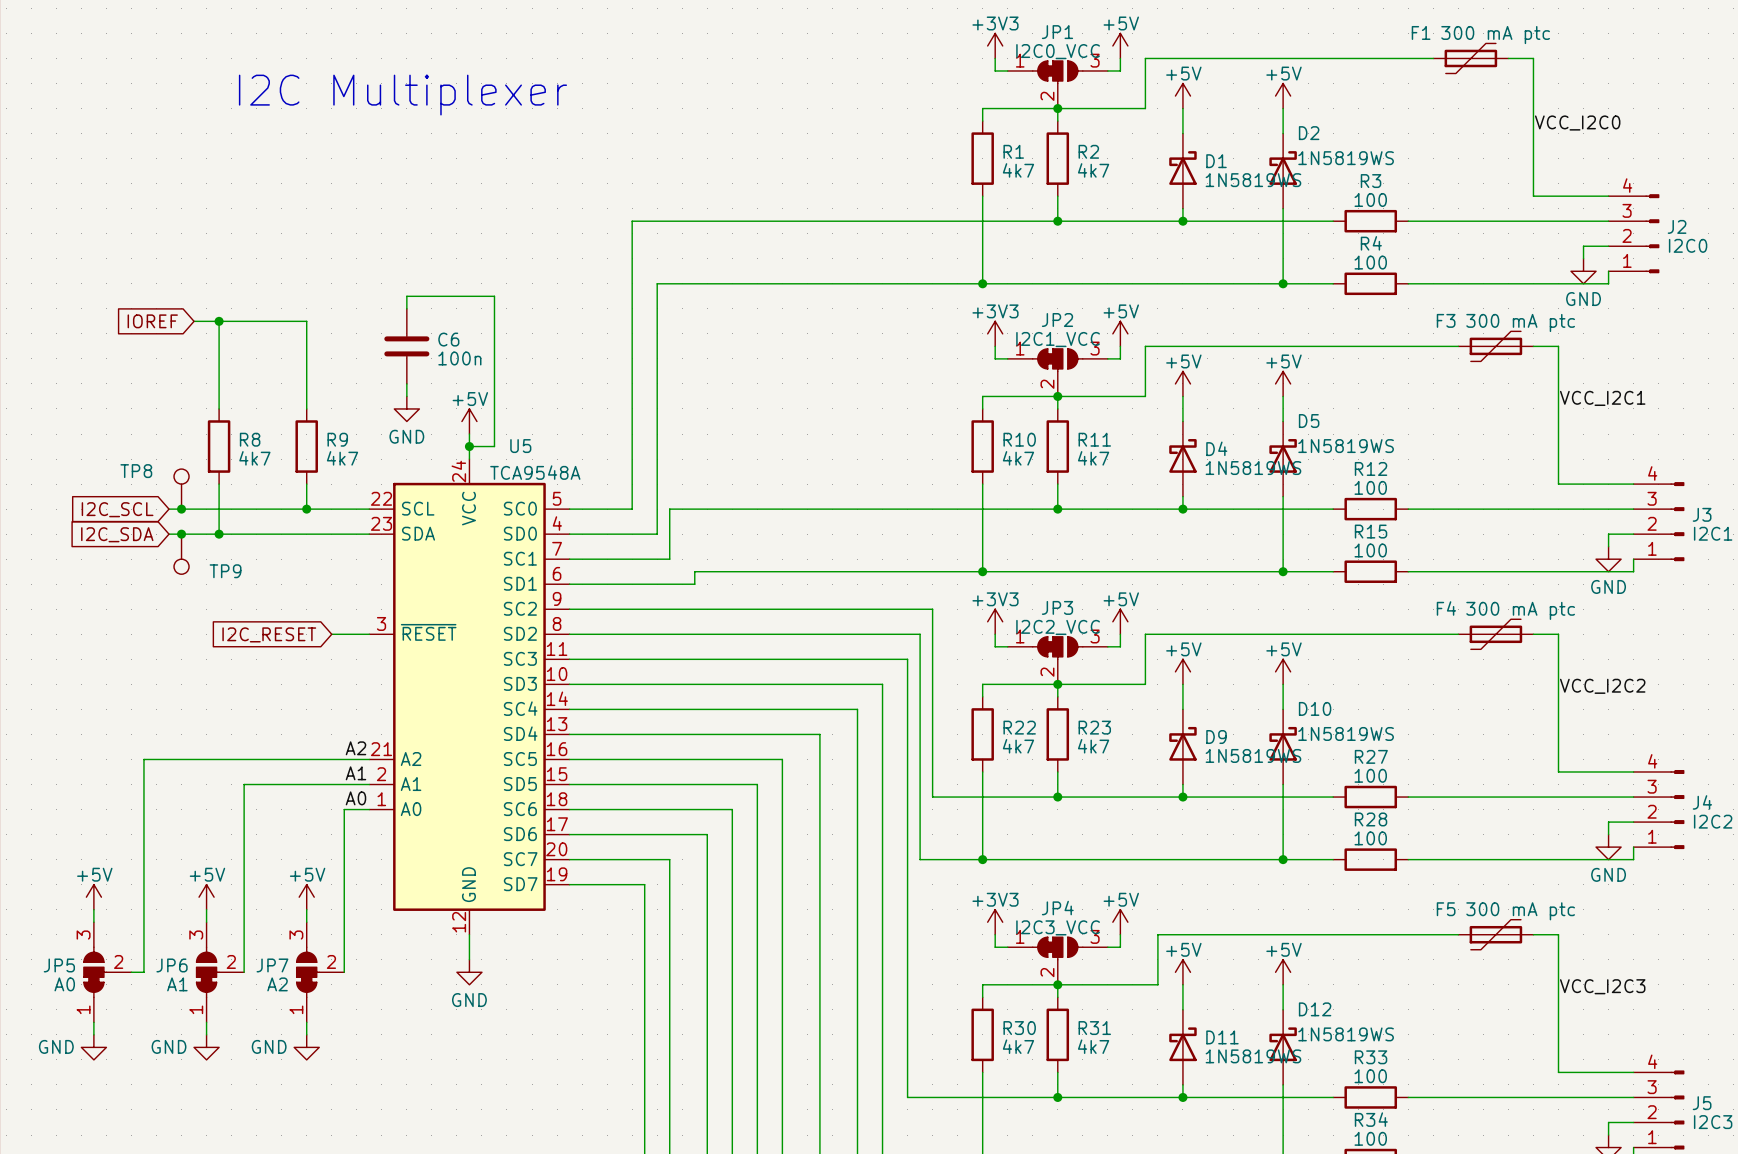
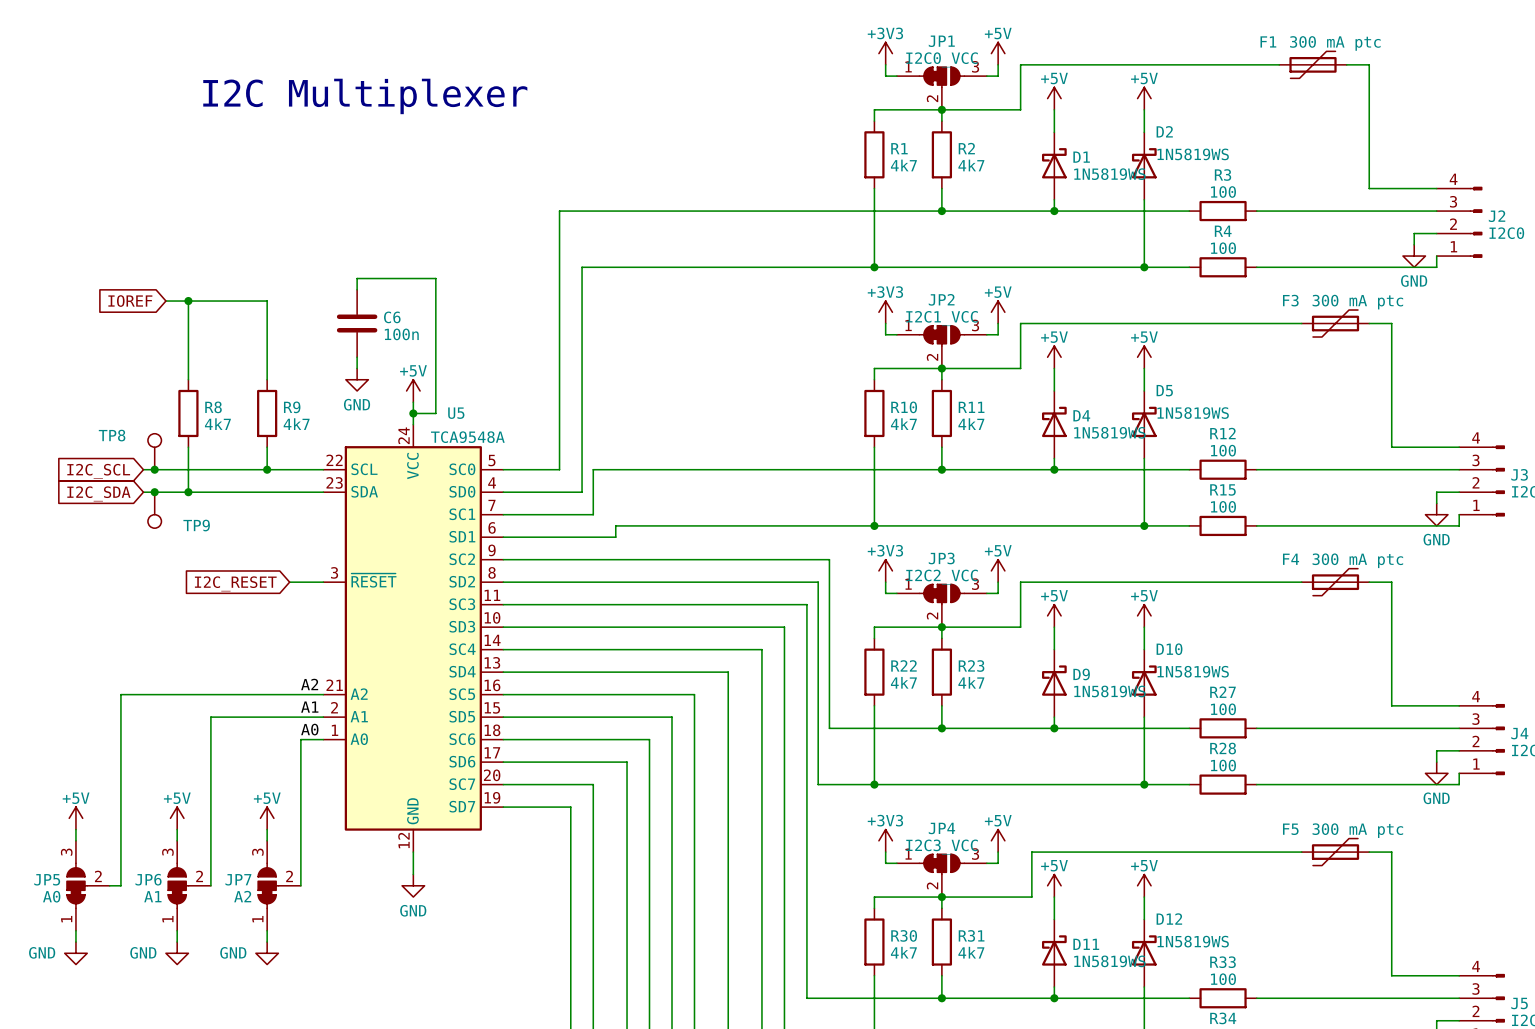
label: VCC_I2C0 (1577, 123) -> none
label: VCC_I2C1 (1602, 398) -> none
label: VCC_I2C2 (1602, 686) -> none
label: VCC_I2C3 (1602, 986) -> none

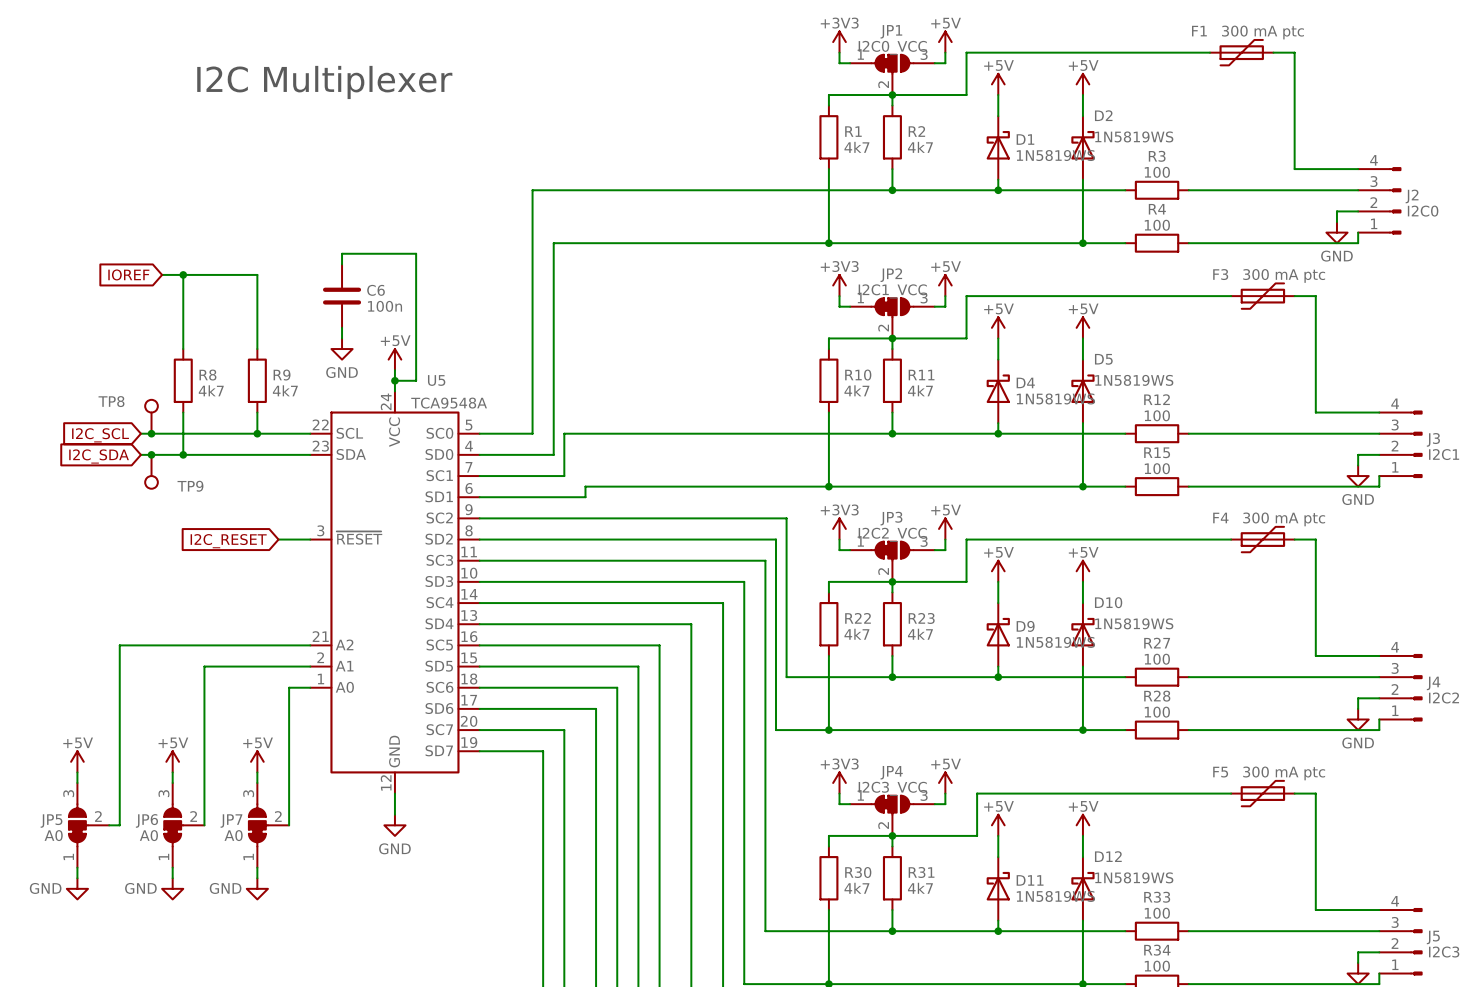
label: A2 (309, 684) -> none
label: A1 (309, 707) -> none
label: A0 (309, 729) -> none
JP6 value: A1 (152, 896) -> A0 (148, 835)
JP7 value: A2 (242, 896) -> A0 (233, 835)

